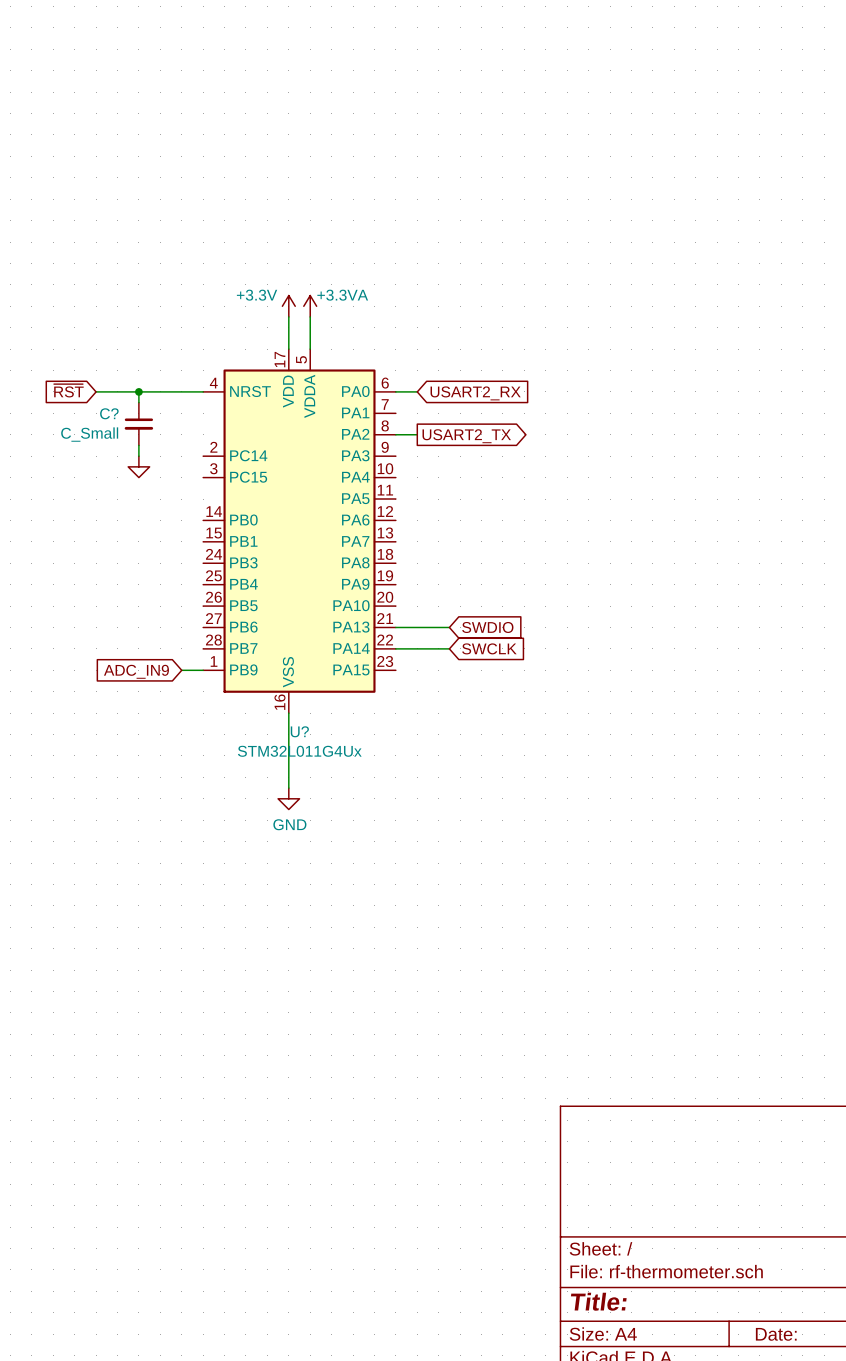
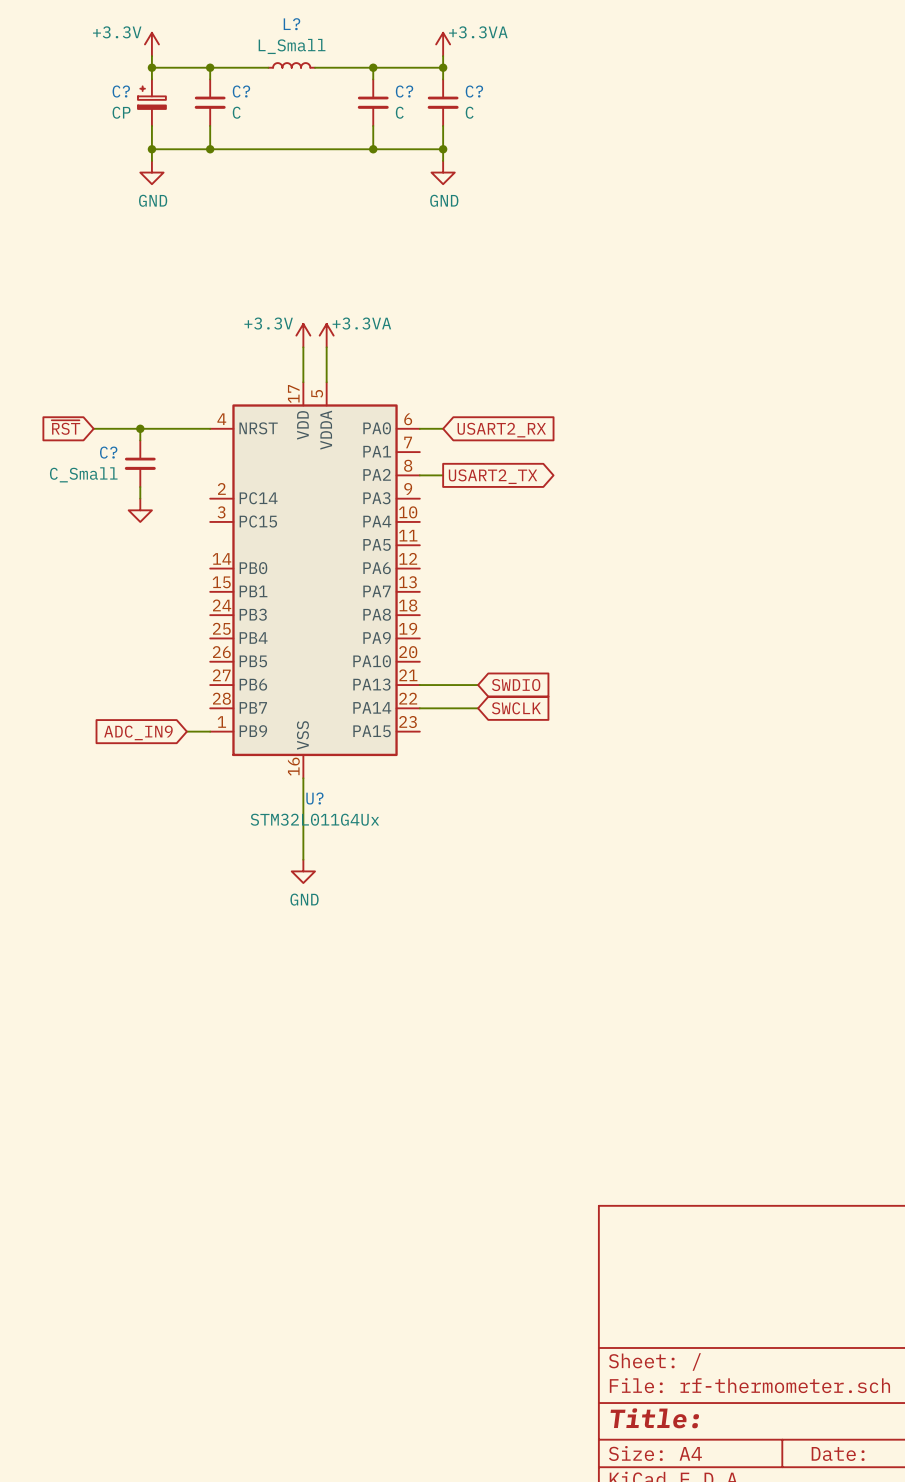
power symbol: none -> +3.3V (151, 44)
power symbol: none -> +3.3VA (443, 44)
wire: none -> (151, 56) (151, 79)
wire: none -> (443, 56) (443, 79)
L?: none -> L_Small (291, 65)
wire: none -> (151, 67) (268, 67)
junction: none -> (151, 67)
wire: none -> (210, 67) (210, 79)
junction: none -> (210, 67)
wire: none -> (315, 67) (443, 67)
wire: none -> (373, 67) (373, 79)
junction: none -> (373, 67)
junction: none -> (443, 67)
C?: none -> CP (151, 102)
C?: none -> C (210, 102)
C?: none -> C (373, 102)
C?: none -> C (443, 102)
wire: none -> (151, 125) (151, 160)
wire: none -> (210, 125) (210, 149)
wire: none -> (373, 125) (373, 149)
wire: none -> (443, 125) (443, 160)
wire: none -> (151, 149) (443, 149)
junction: none -> (151, 149)
junction: none -> (210, 149)
junction: none -> (373, 149)
junction: none -> (443, 149)
power symbol: none -> GND (151, 172)
power symbol: none -> GND (443, 172)

